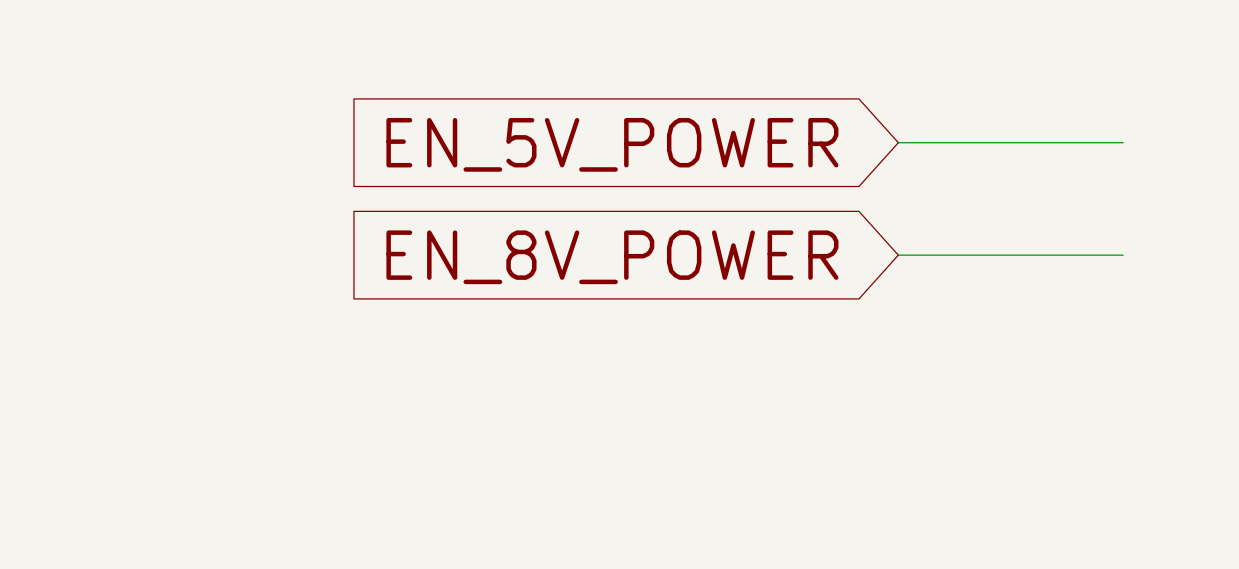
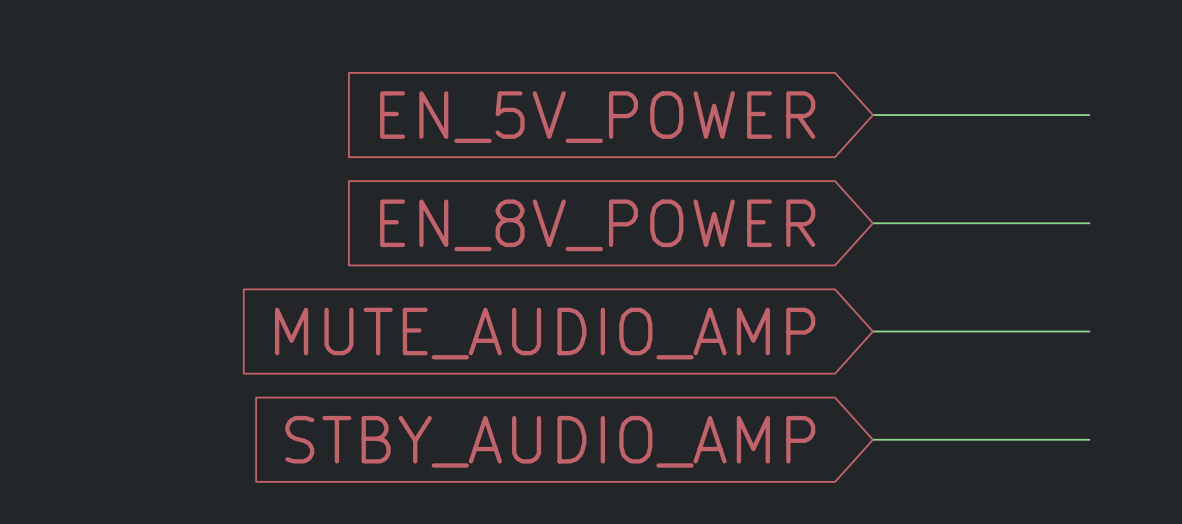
wire: none -> (872, 331) (1089, 331)
global label: none -> MUTE_AUDIO_AMP (545, 333)
wire: none -> (872, 439) (1089, 439)
global label: none -> STBY_AUDIO_AMP (550, 441)

